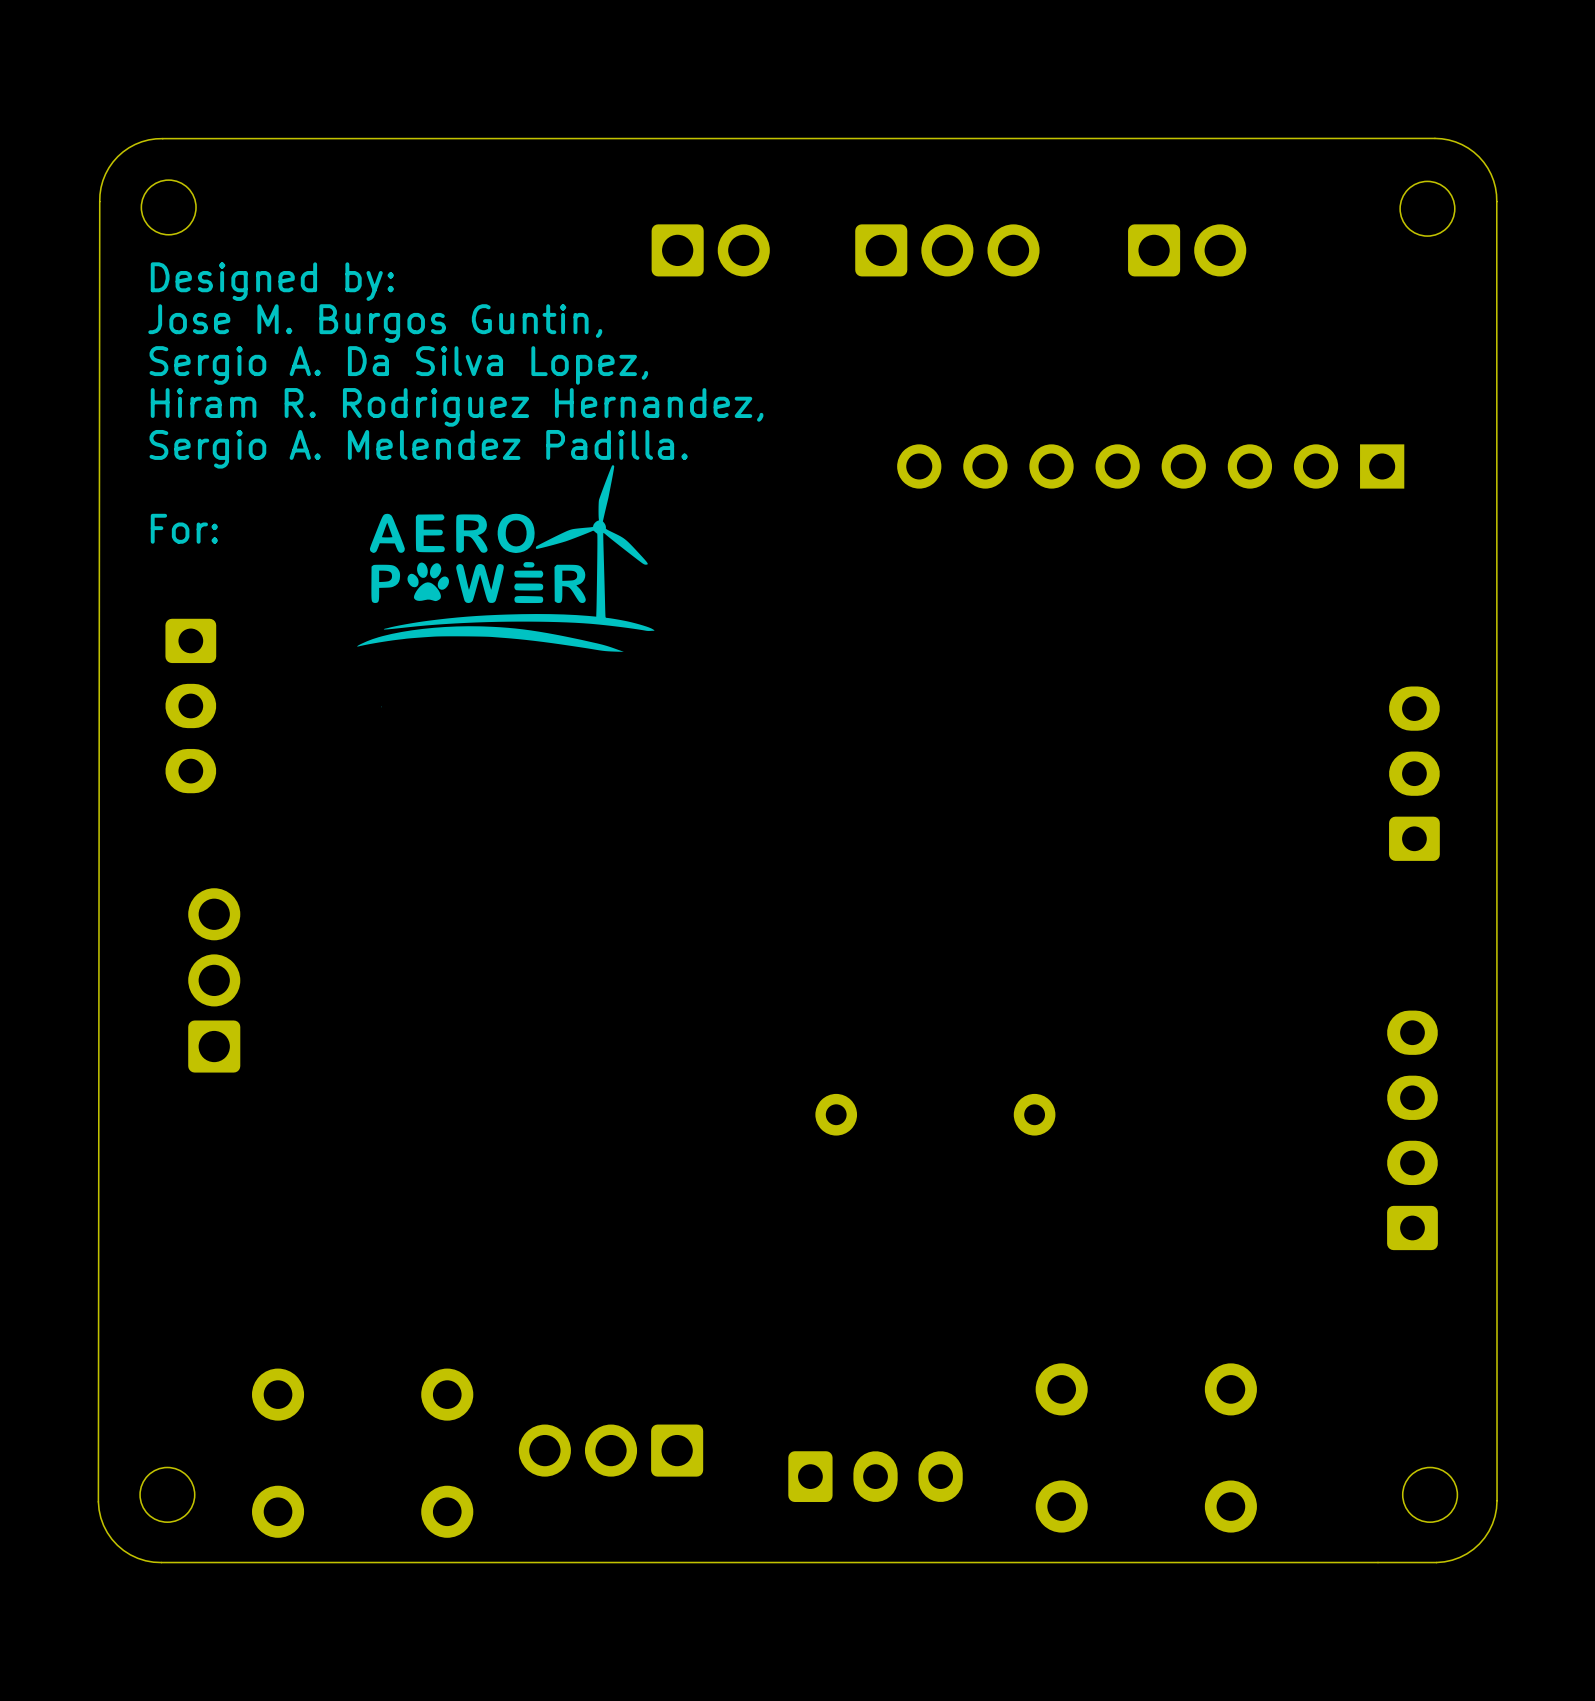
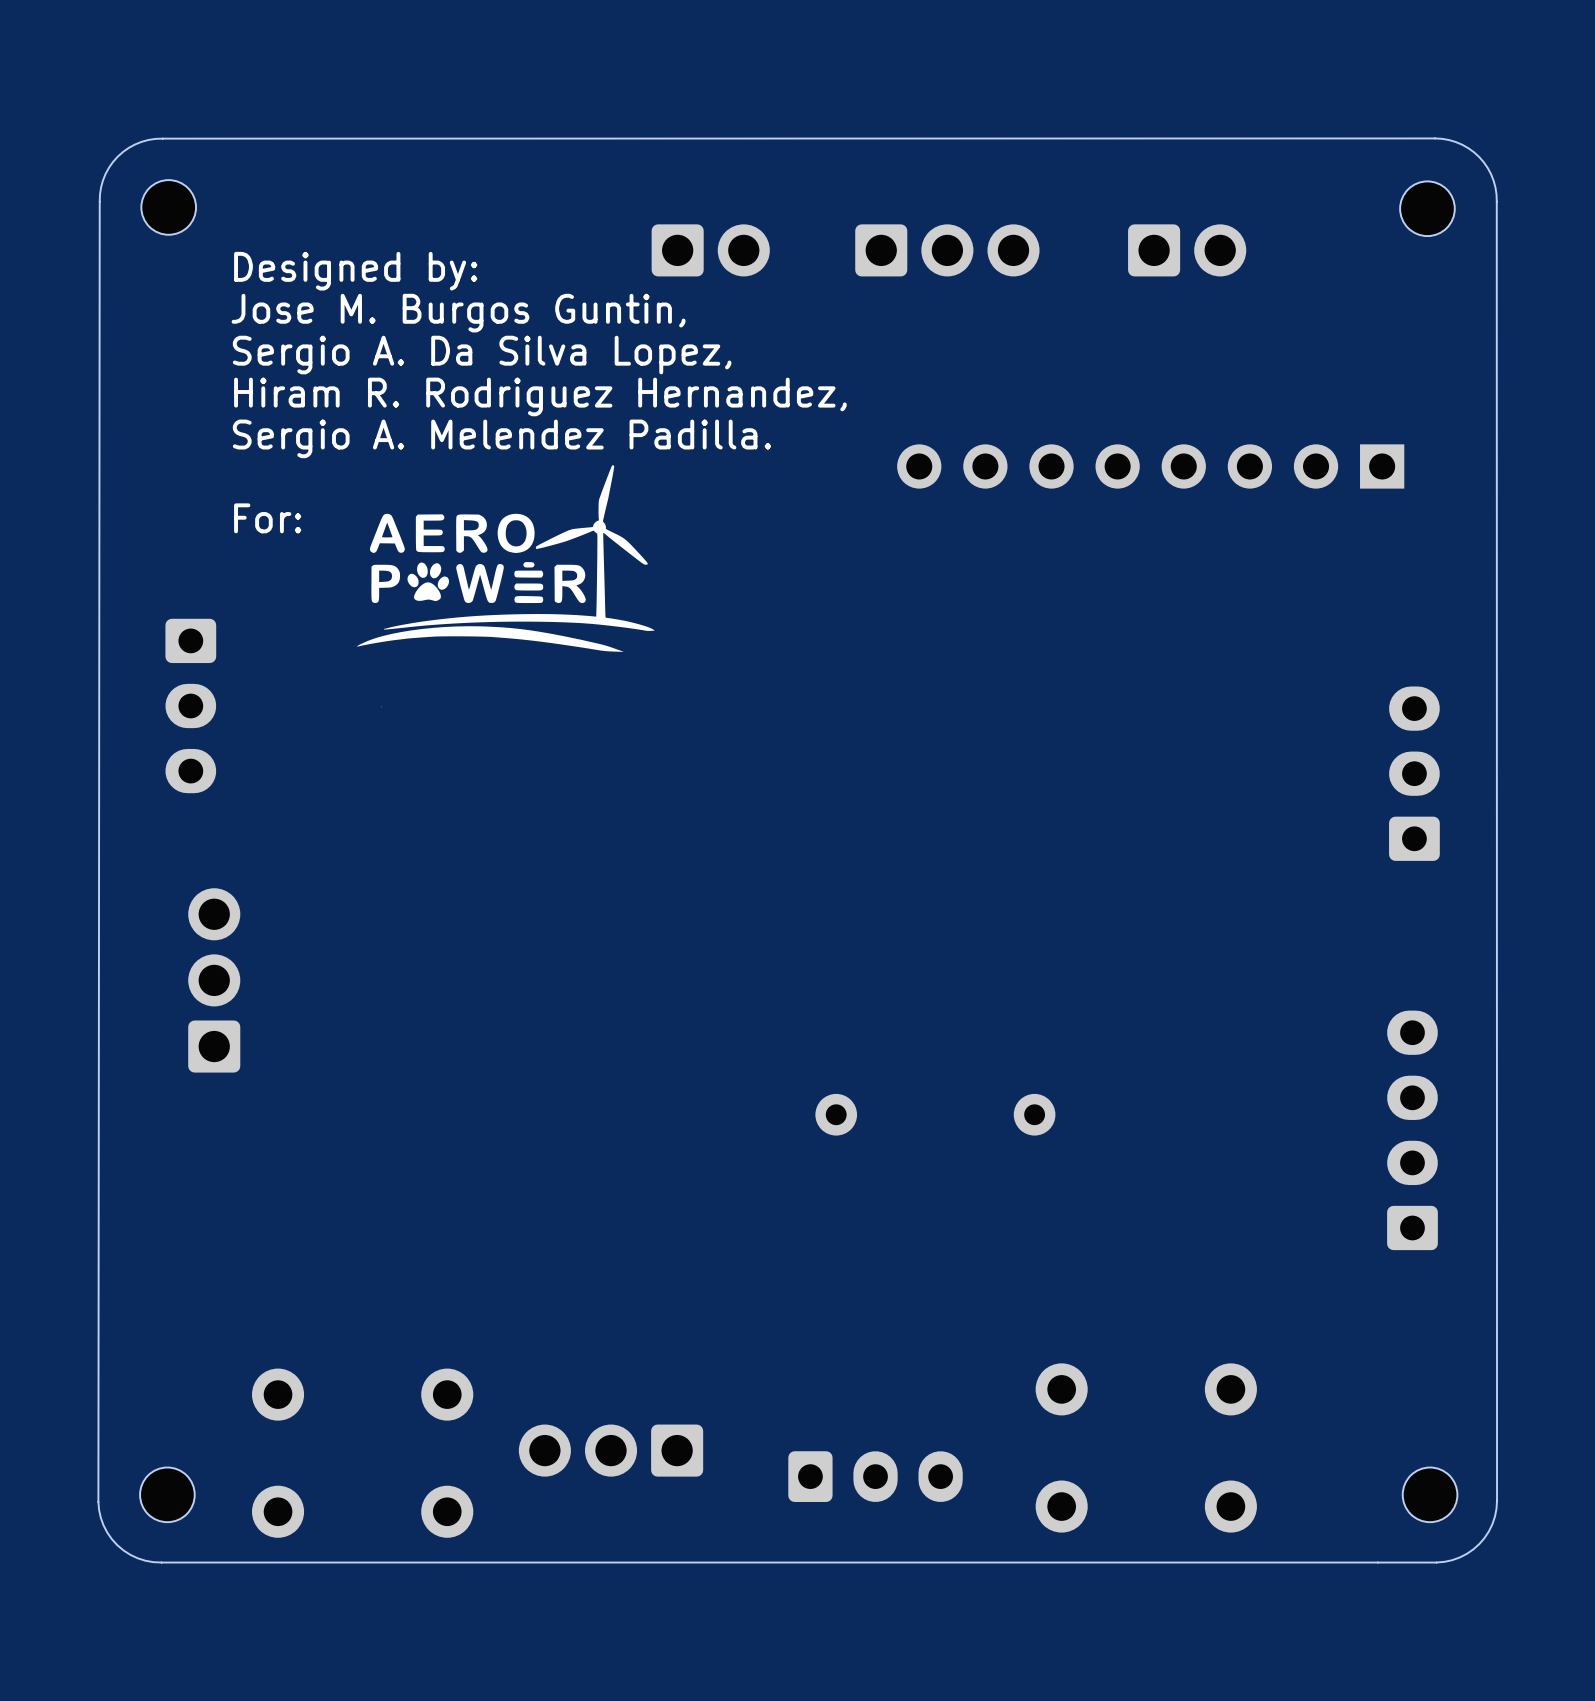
text position: Designed by: (272, 281) -> Designed by: (355, 271)
text position: Jose M. Burgos Guntin, (375, 323) -> Jose M. Burgos Guntin, (458, 313)
text position: Sergio A. Da Silva Lopez, (398, 365) -> Sergio A. Da Silva Lopez, (482, 355)
text position: Hiram R. Rodriguez Hernandez, (457, 407) -> Hiram R. Rodriguez Hernandez, (540, 396)
text position: Sergio A. Melendez Padilla. (418, 449) -> Sergio A. Melendez Padilla. (501, 438)
text position: For: (184, 528) -> For: (267, 518)

